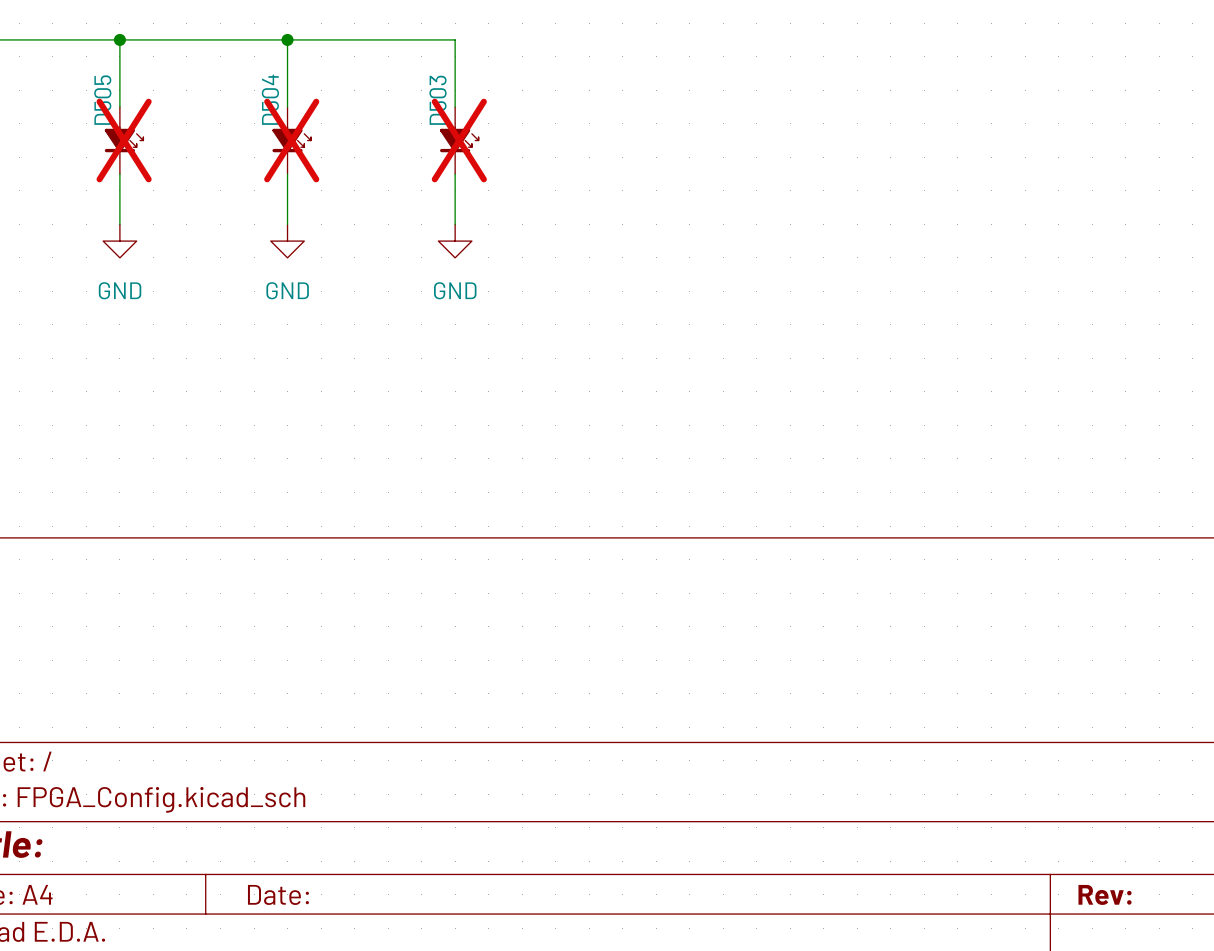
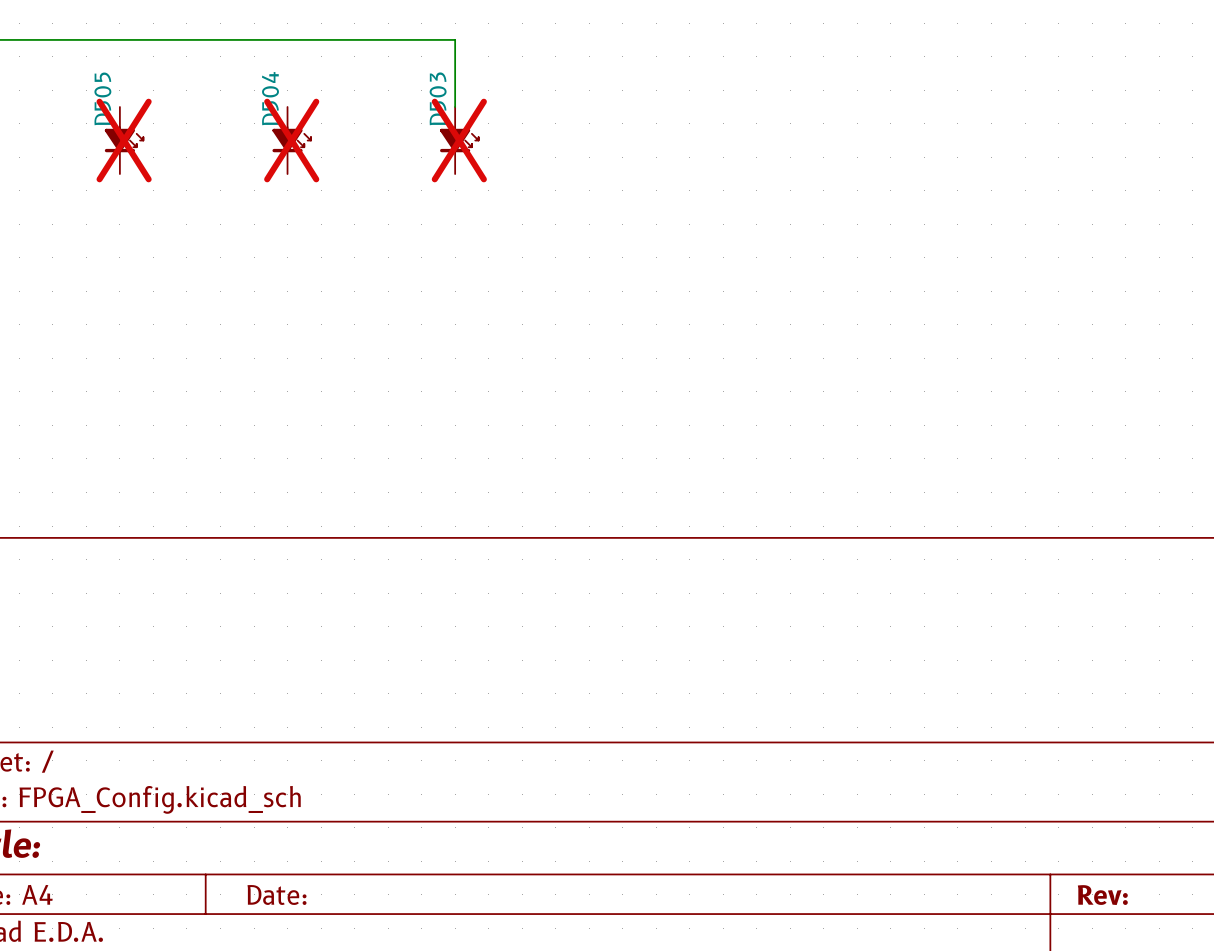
wire: (119, 39) (119, 107) -> none
junction: (119, 39) -> none
wire: (287, 39) (287, 107) -> none
junction: (287, 39) -> none
wire: (119, 174) (119, 224) -> none
wire: (287, 174) (287, 224) -> none
wire: (455, 174) (455, 224) -> none
power symbol: GND (119, 241) -> none
power symbol: GND (287, 241) -> none
power symbol: GND (455, 241) -> none

